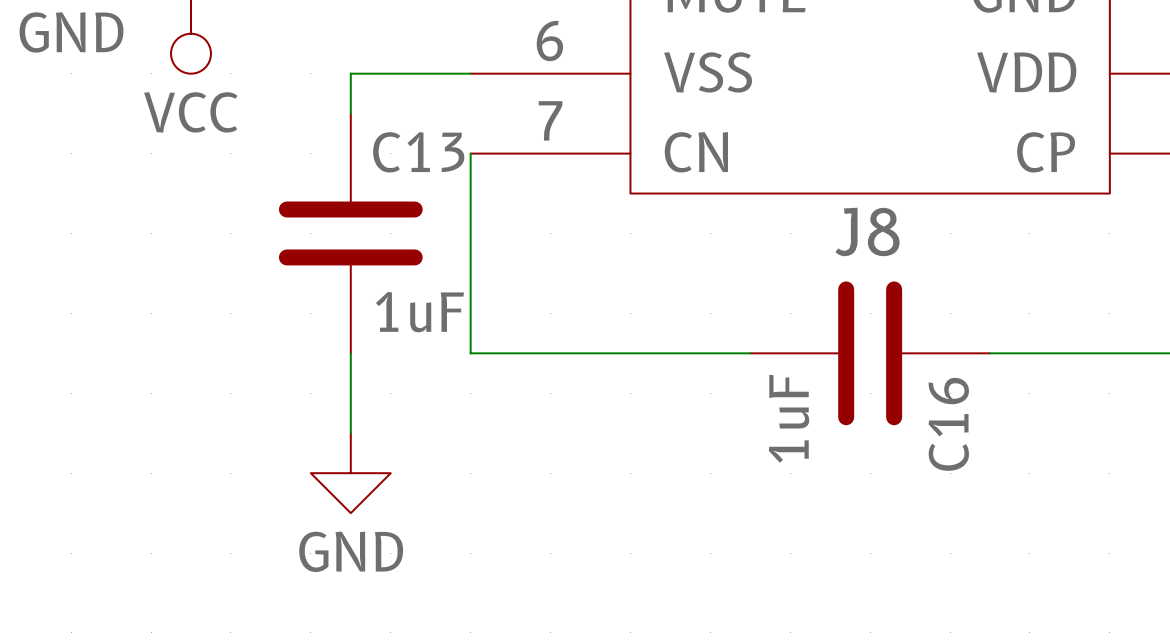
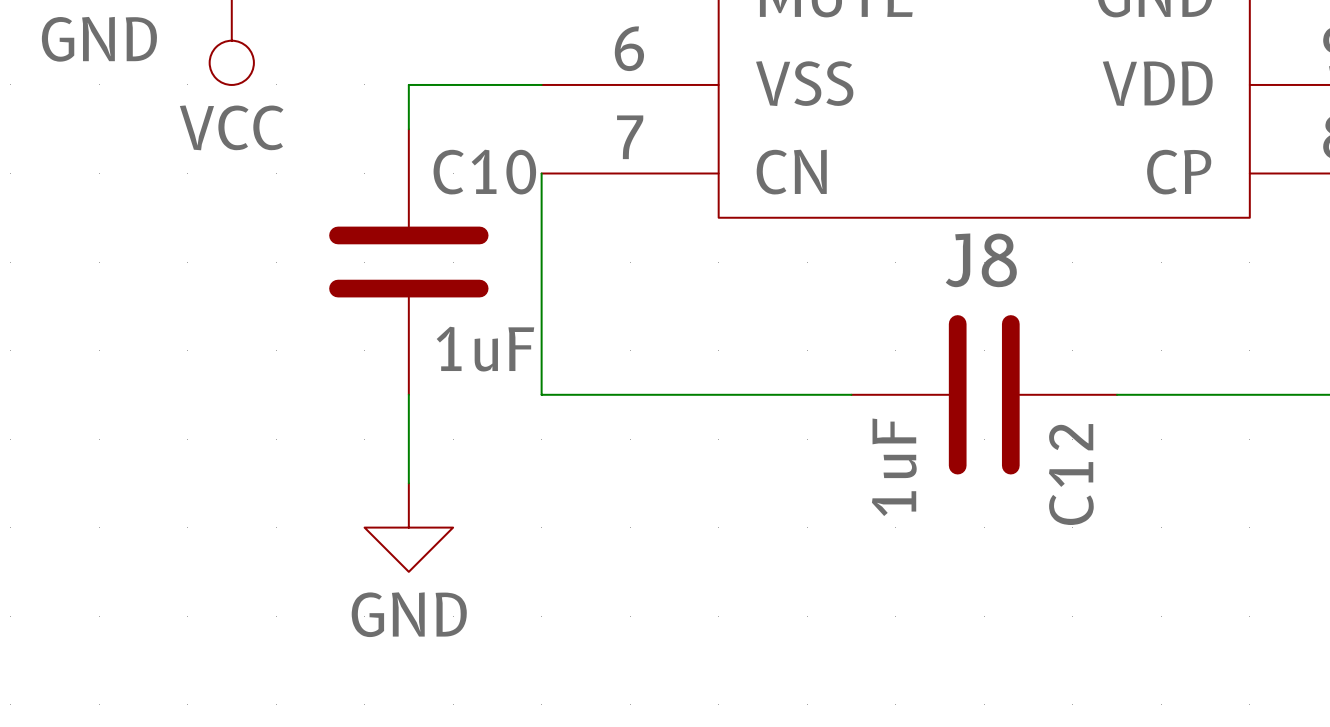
C13 name: C13 (418, 152) -> C10 (484, 172)
C16 name: C16 (948, 424) -> C12 (1071, 474)

